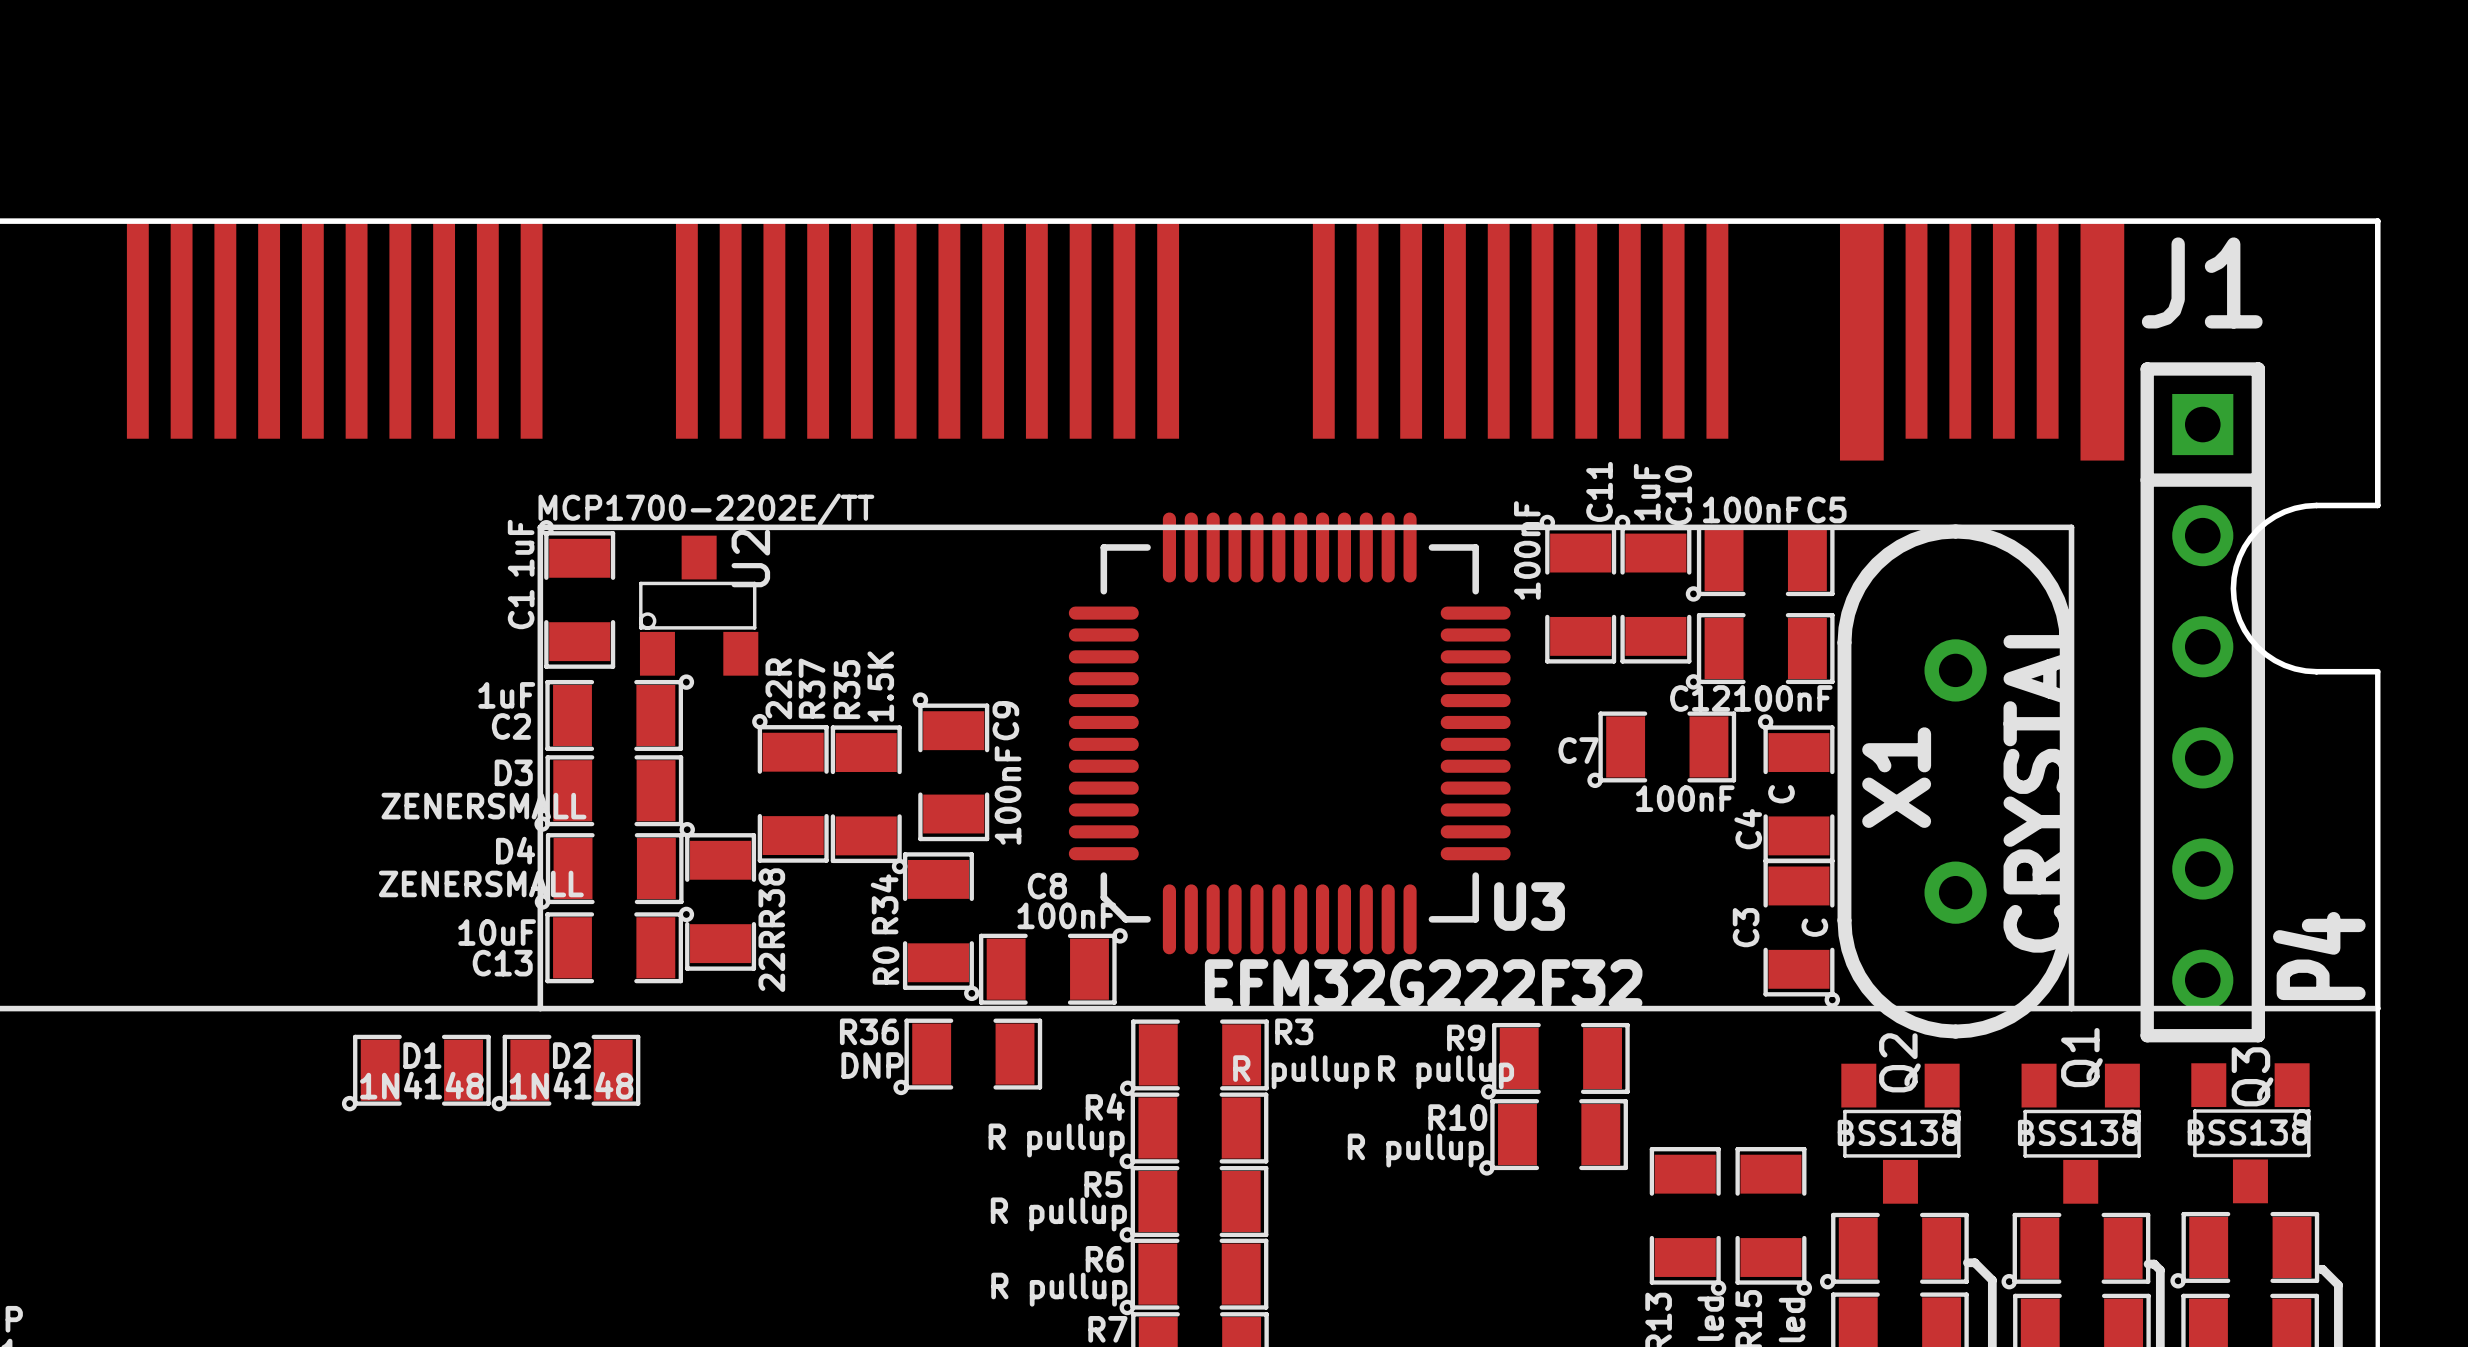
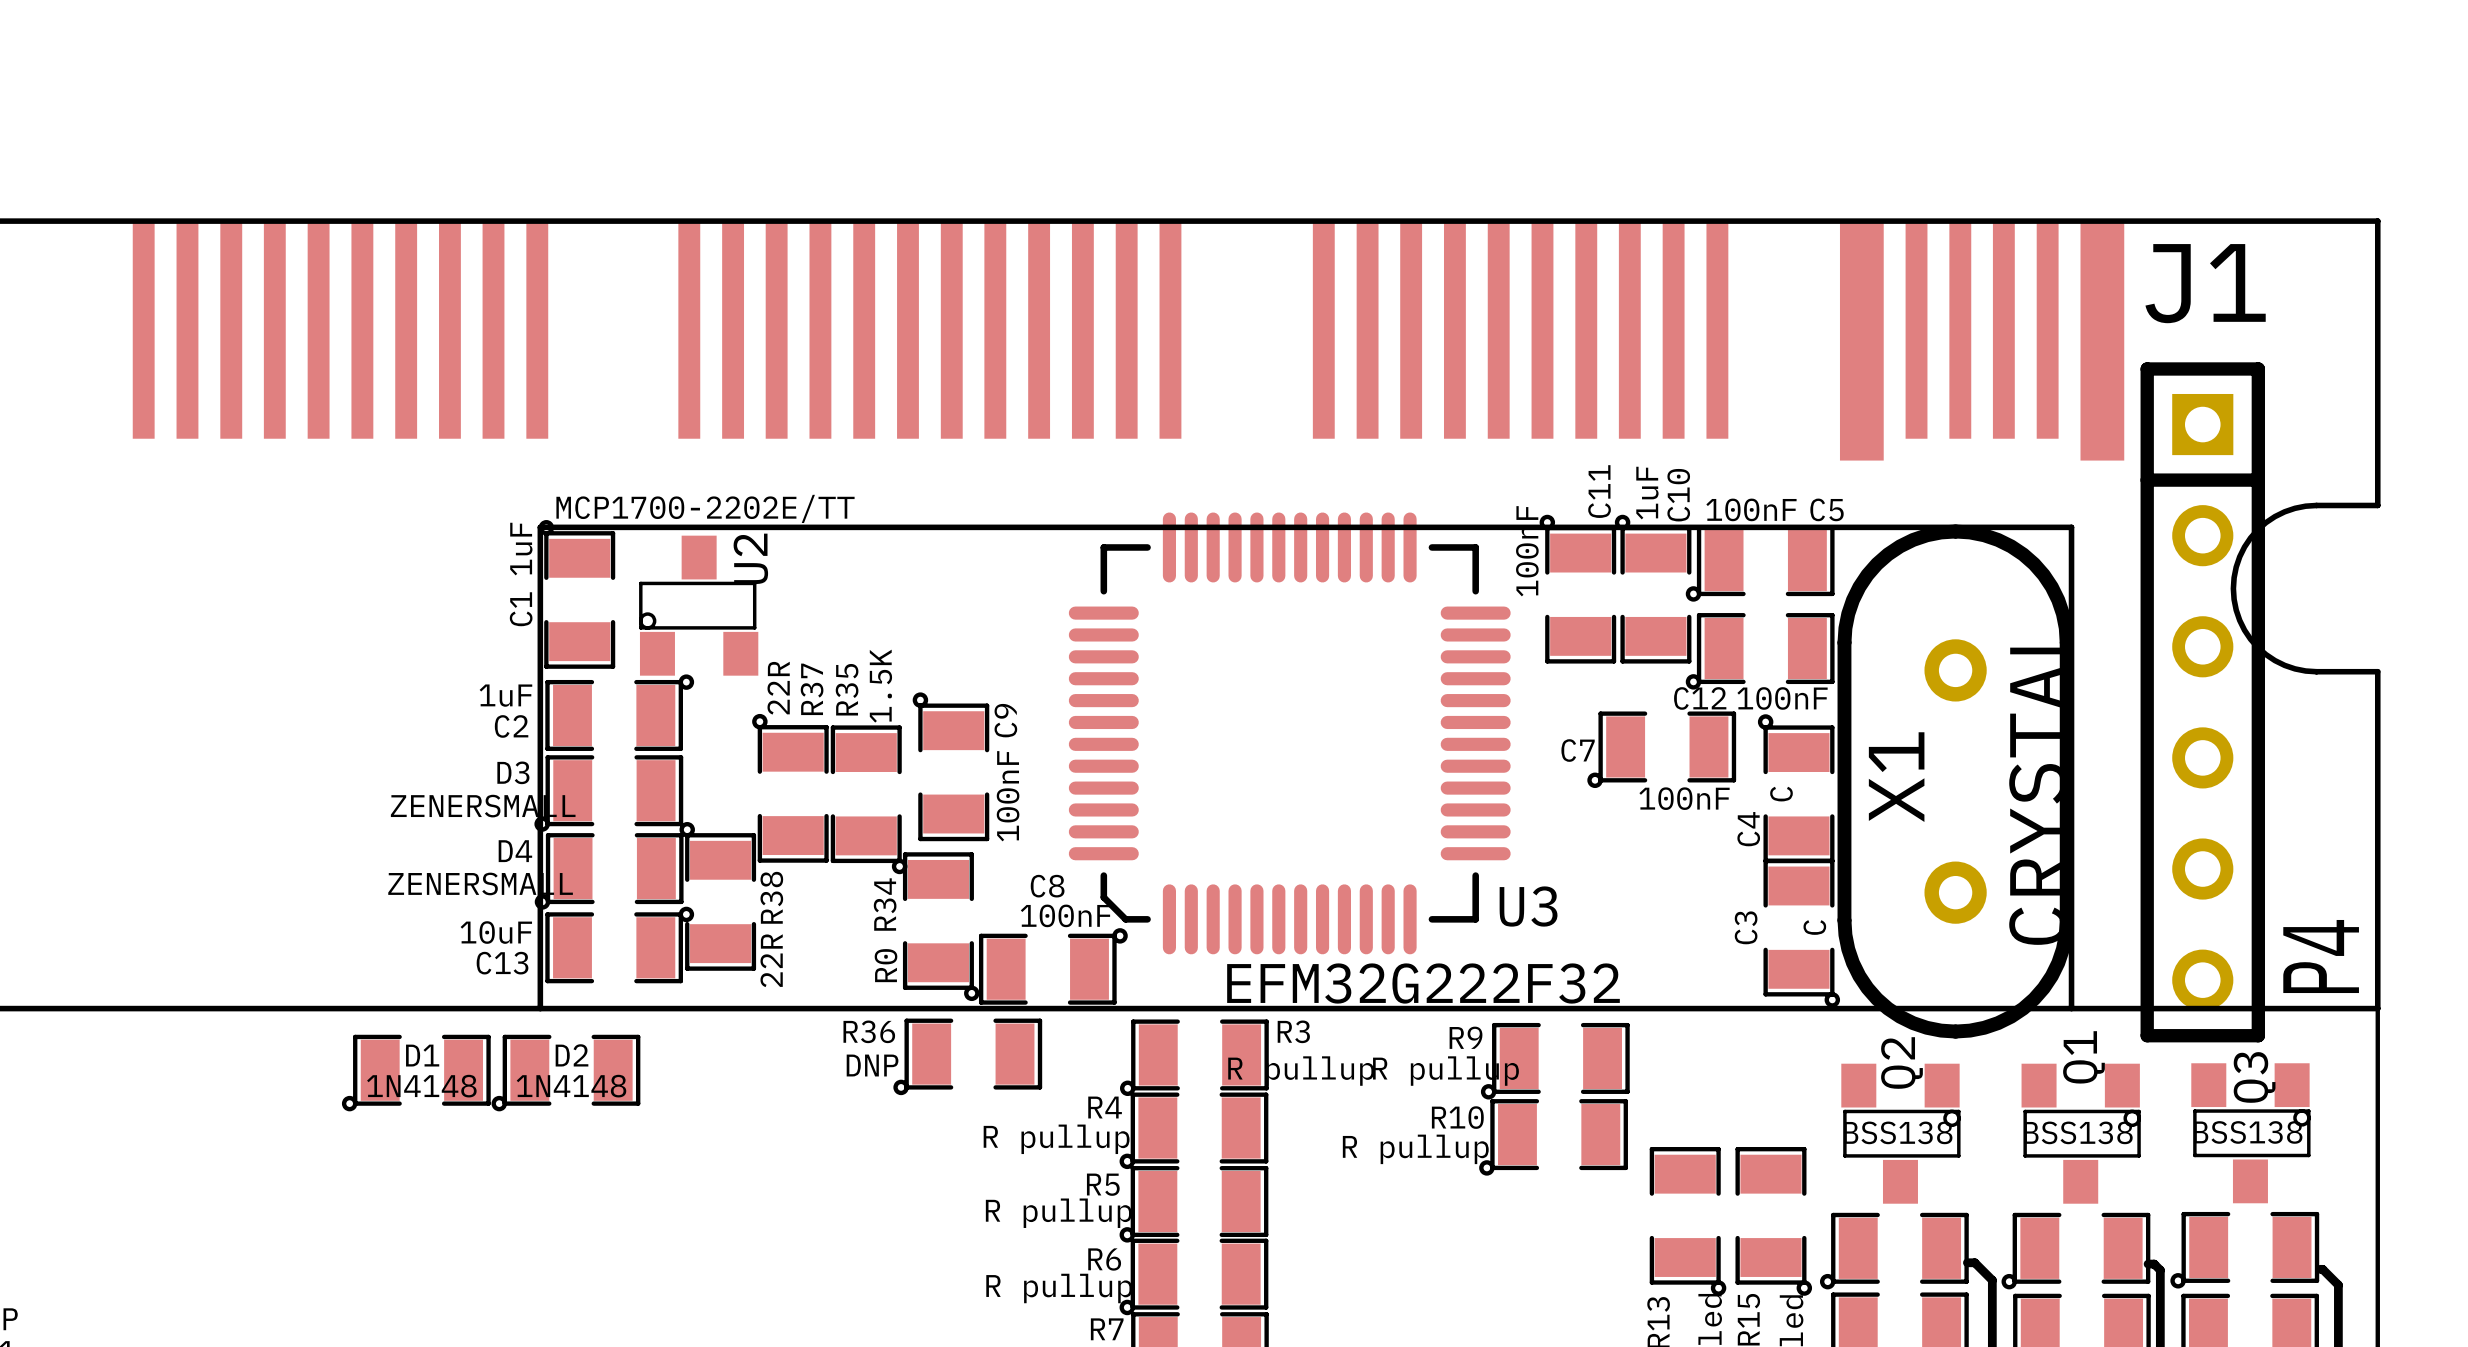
J1 footprint: [126, 219, 2125, 461] -> [132, 219, 2125, 461]

